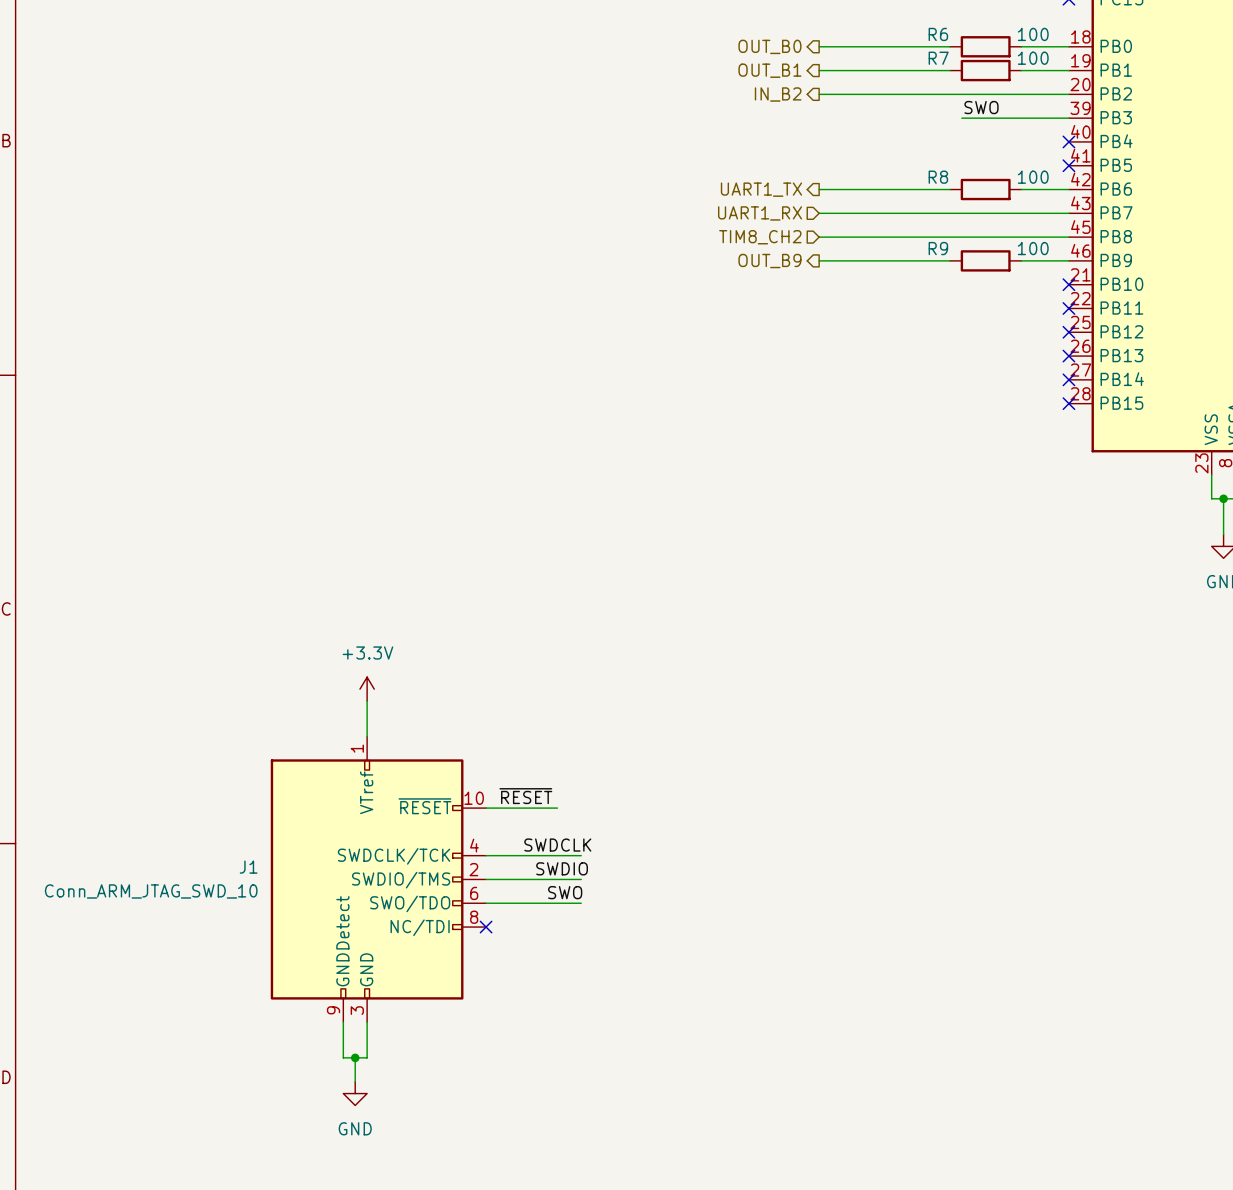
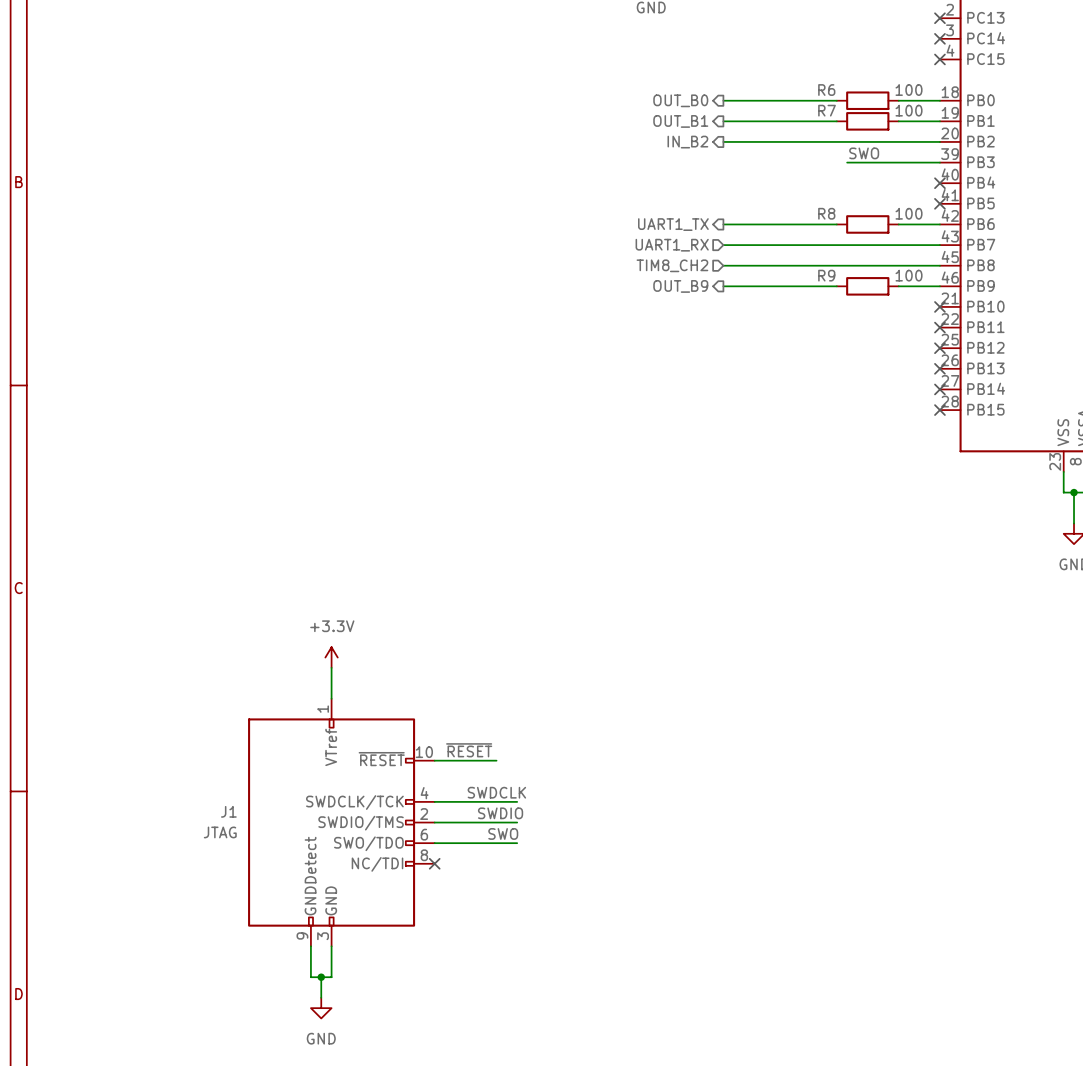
J1 value: Conn_ARM_JTAG_SWD_10 (151, 891) -> JTAG (220, 832)

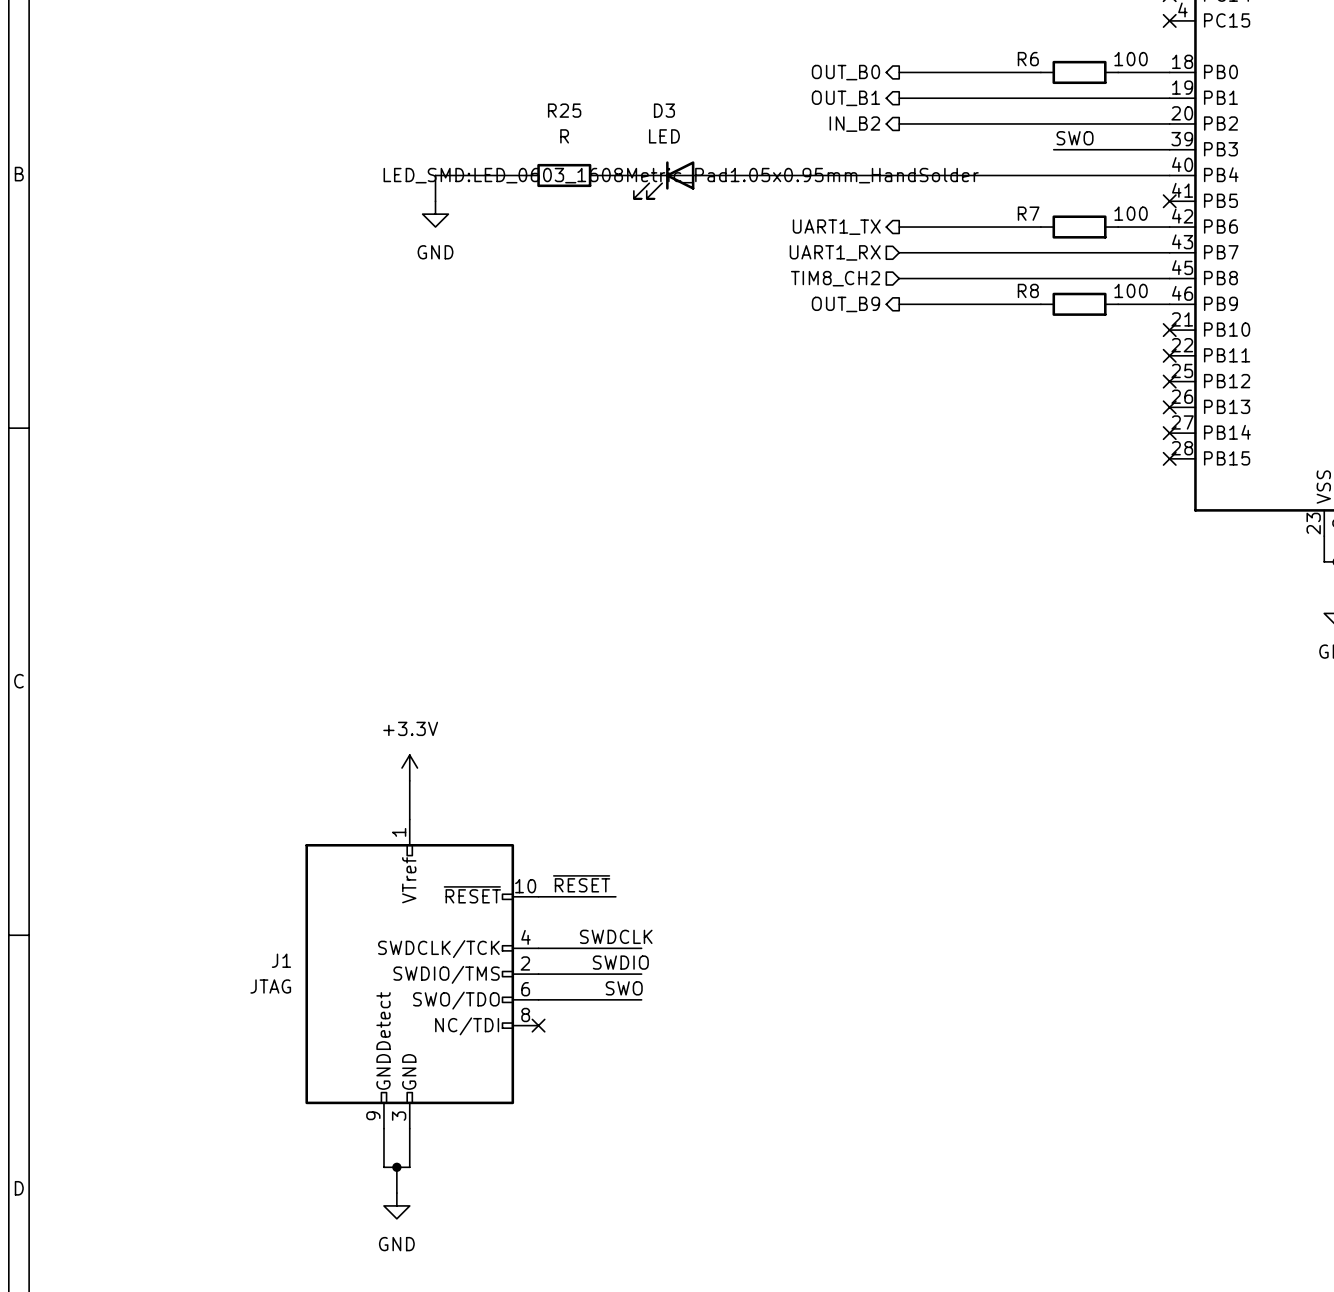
wire: none -> (1040, 98) (1118, 98)
R7: 100 (867, 121) -> none
wire: none -> (525, 175) (435, 175) (435, 201)
R25: none -> R (564, 175)
wire: none -> (602, 175) (641, 175)
wire: none -> (718, 175) (1169, 175)
no-connect mark: (939, 183) -> none
D3: none -> LED (676, 180)
R8 name: R8 (826, 213) -> R7 (1028, 213)
power symbol: none -> GND (435, 214)
R9 name: R9 (826, 275) -> R8 (1028, 290)

